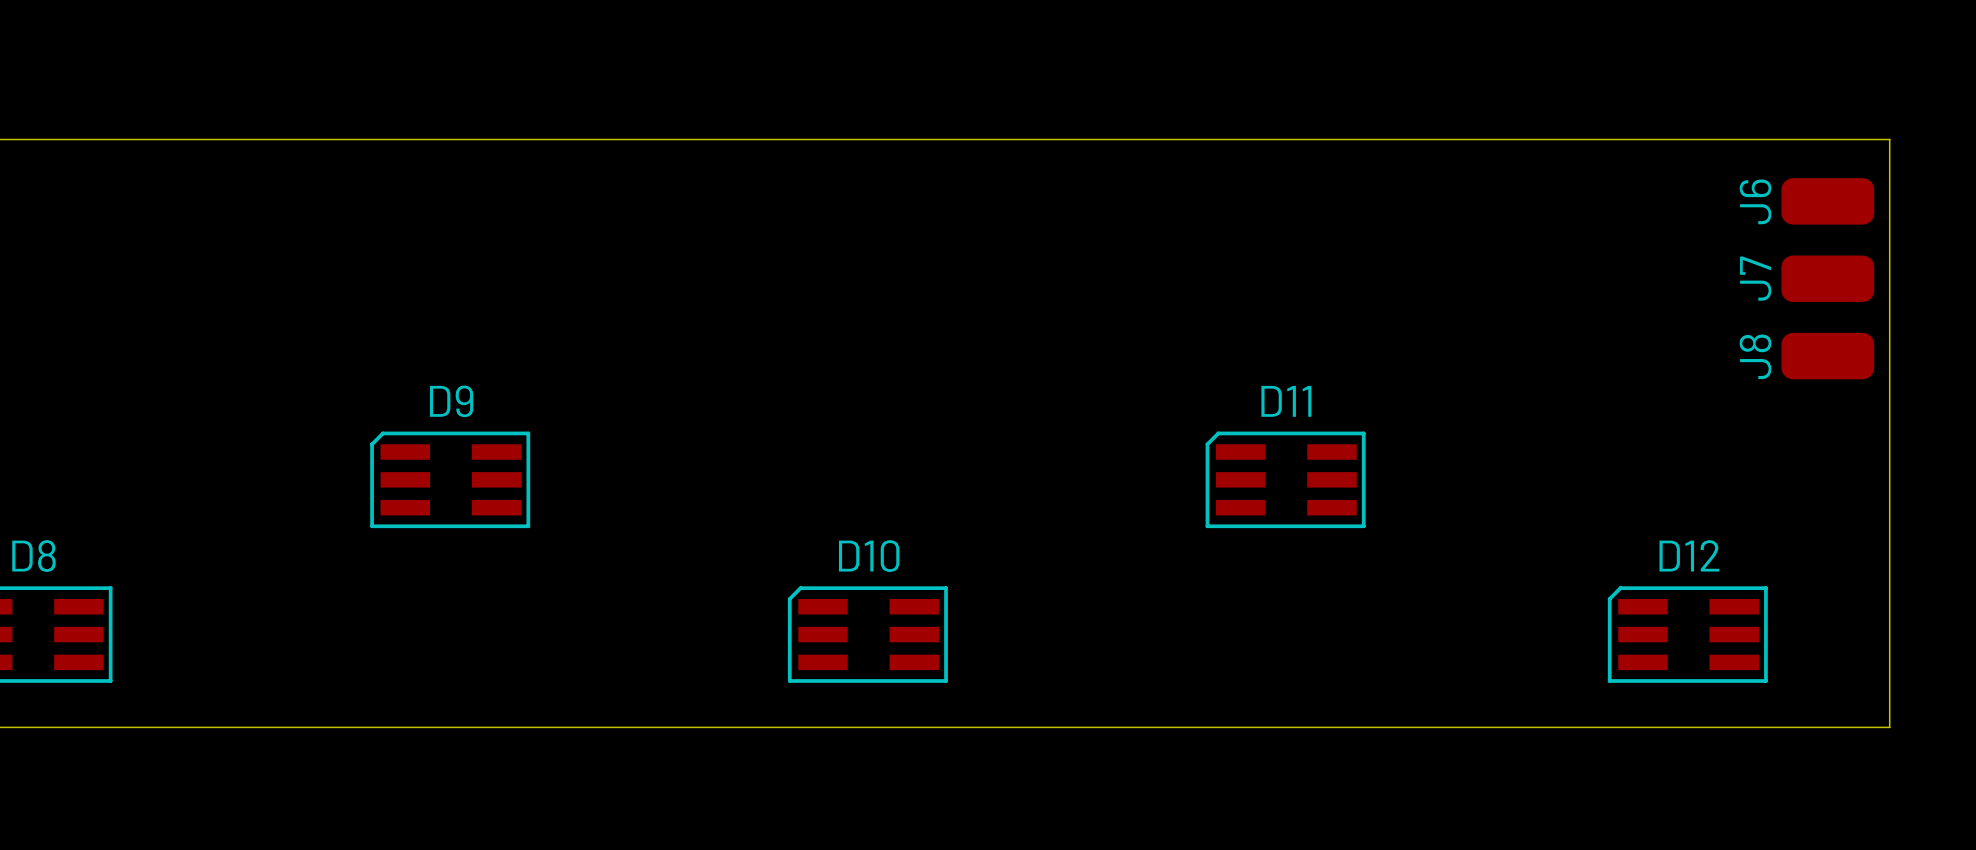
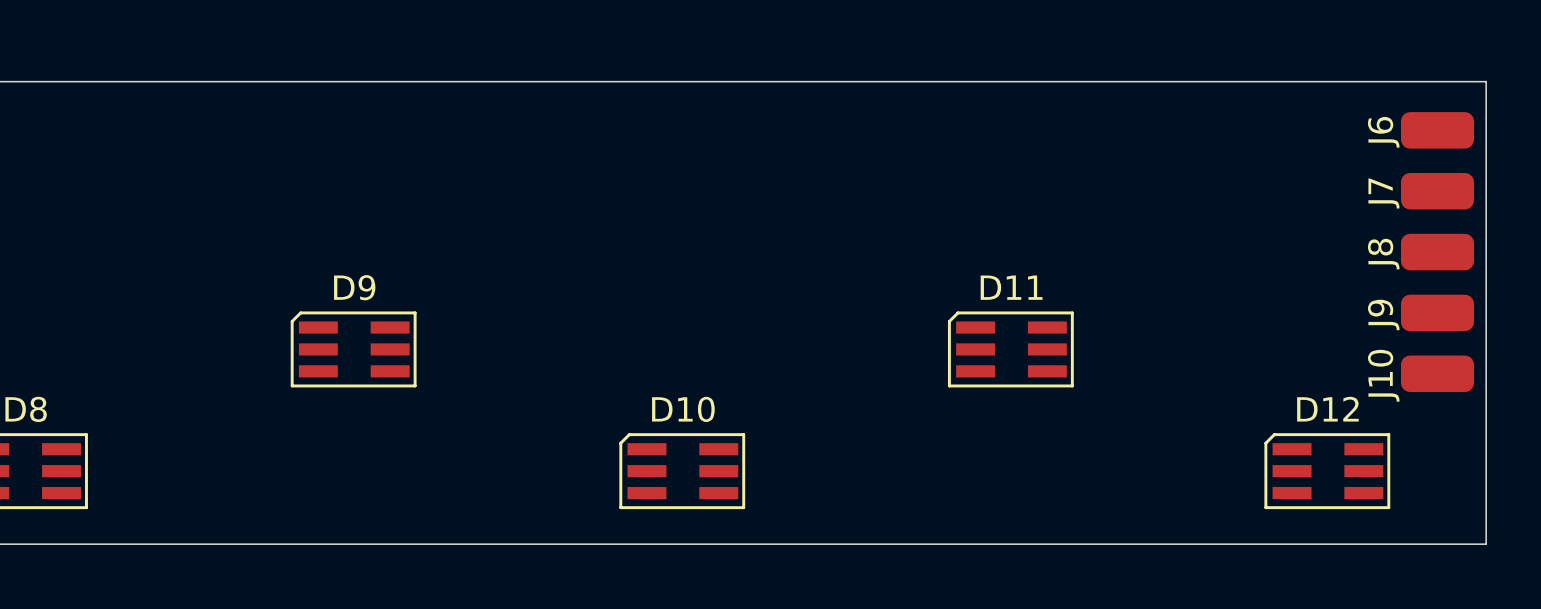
J9: none -> (1437, 312)
J10: none -> (1437, 373)

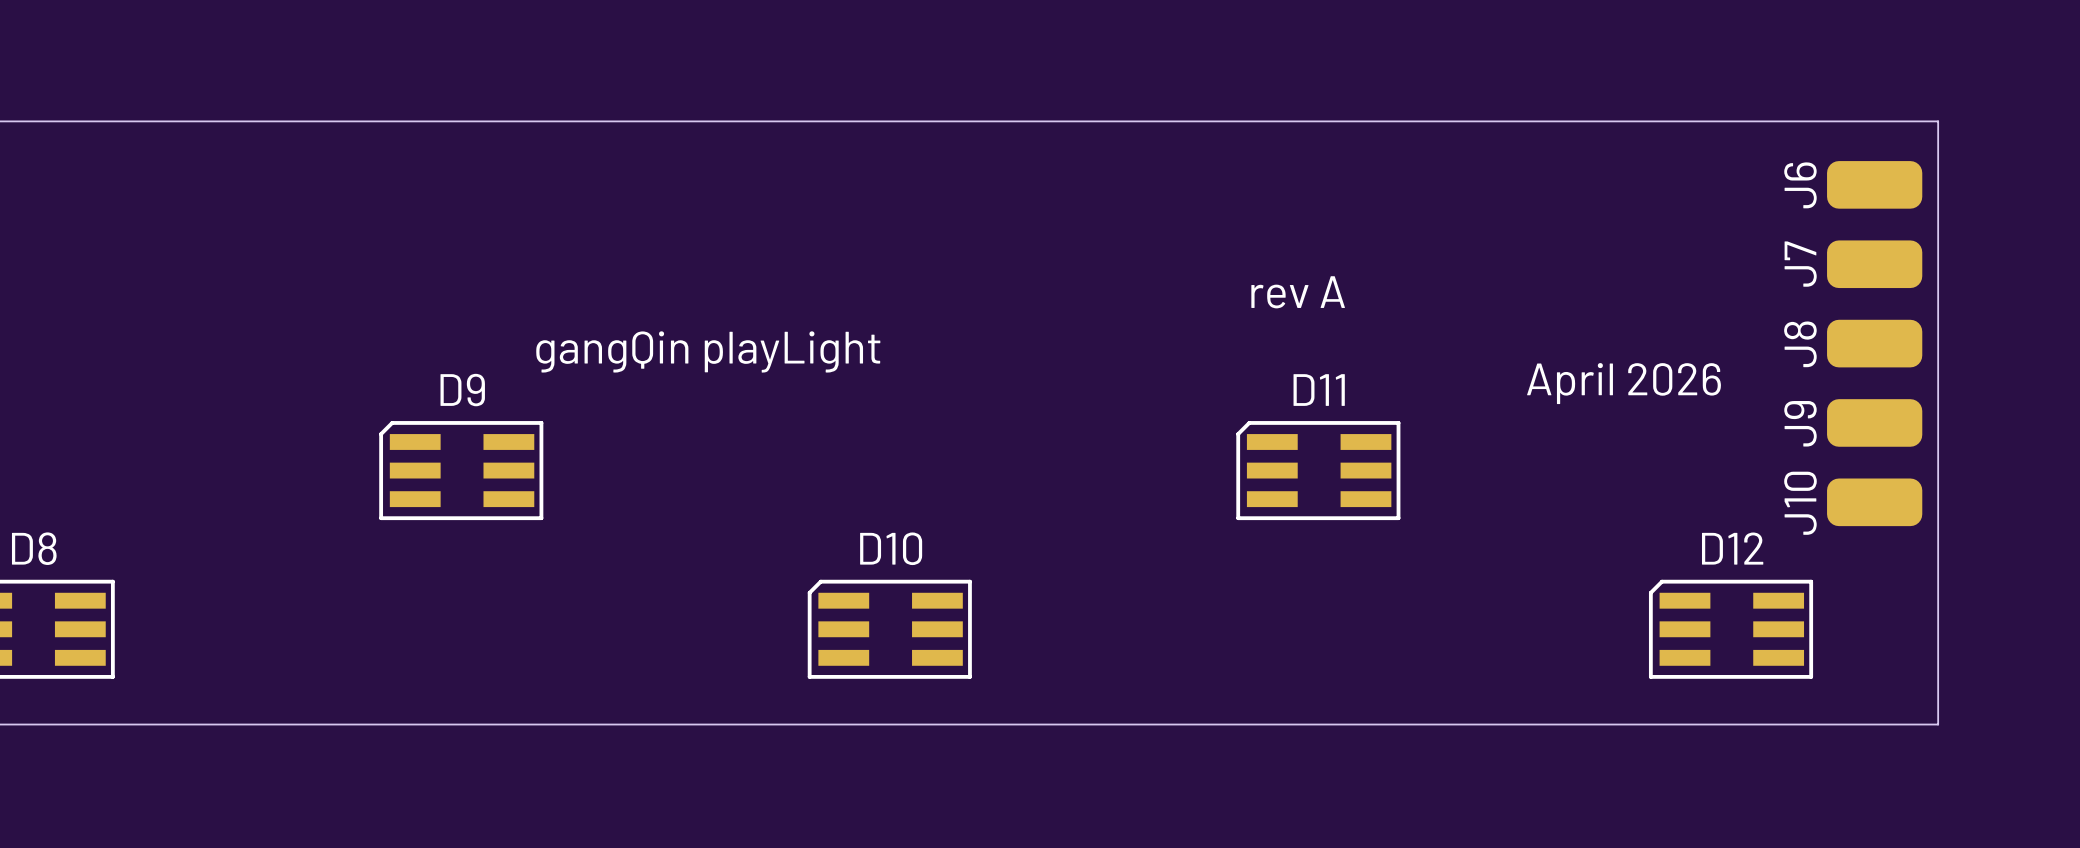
text: none -> rev A (1298, 292)
text: none -> gangQin playLight (708, 351)
text: none -> April 2026 (1623, 383)

